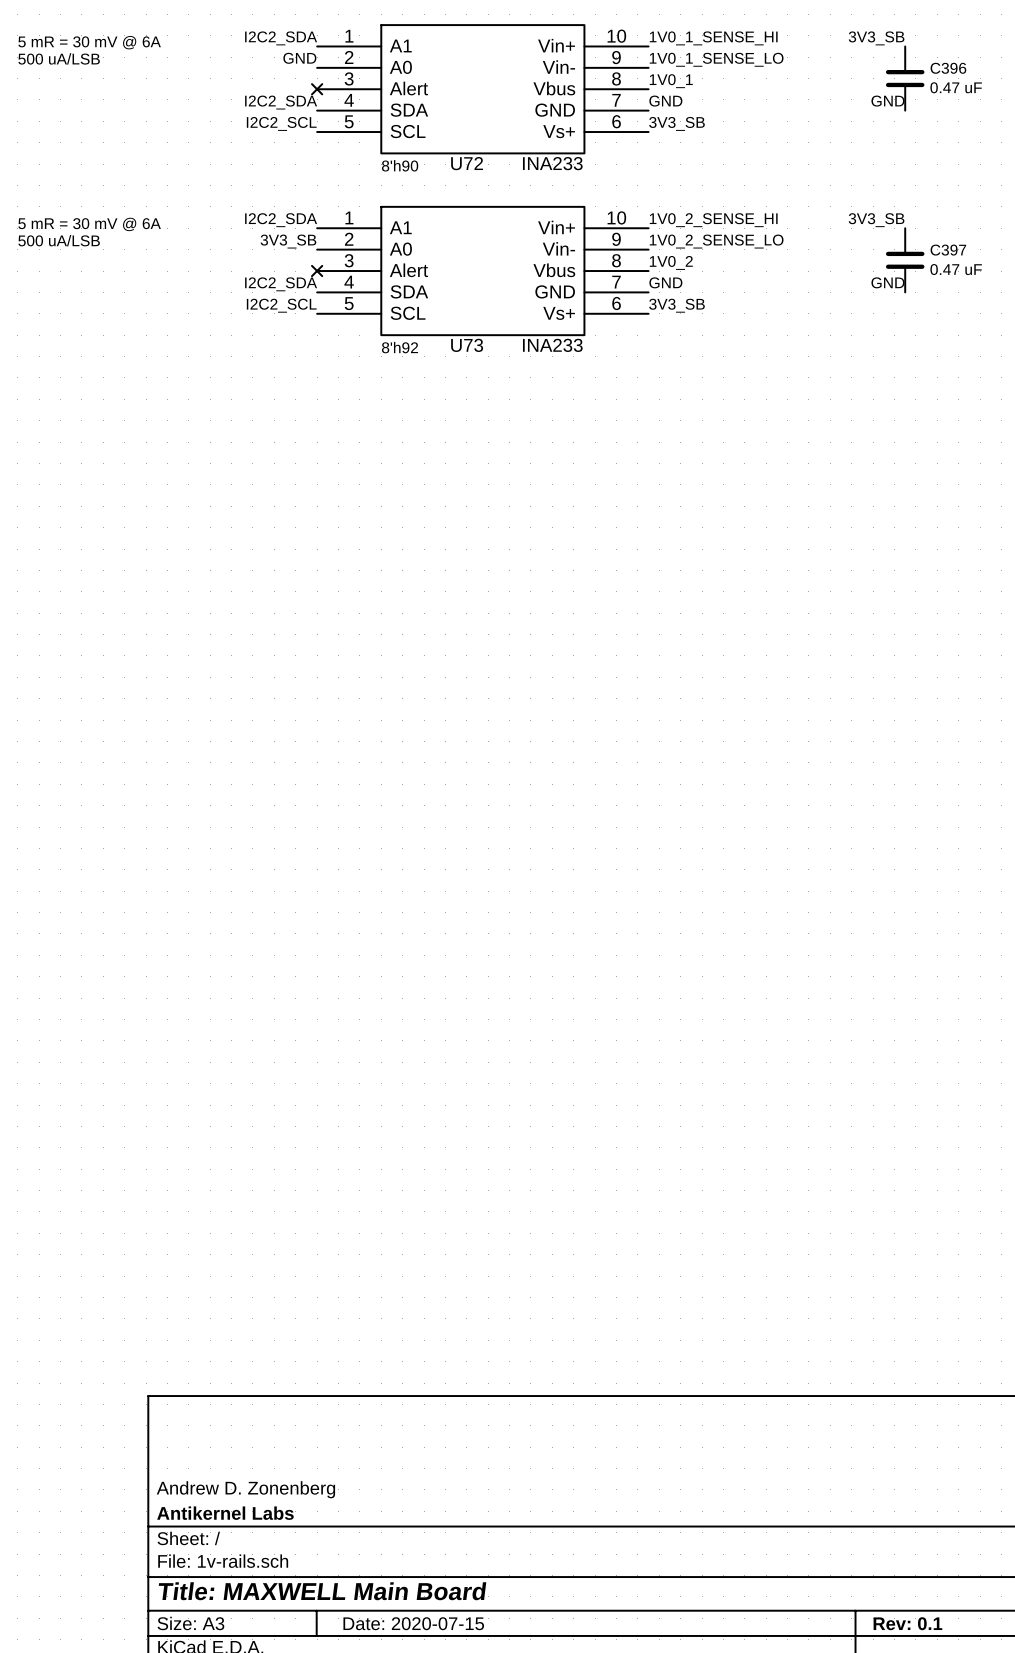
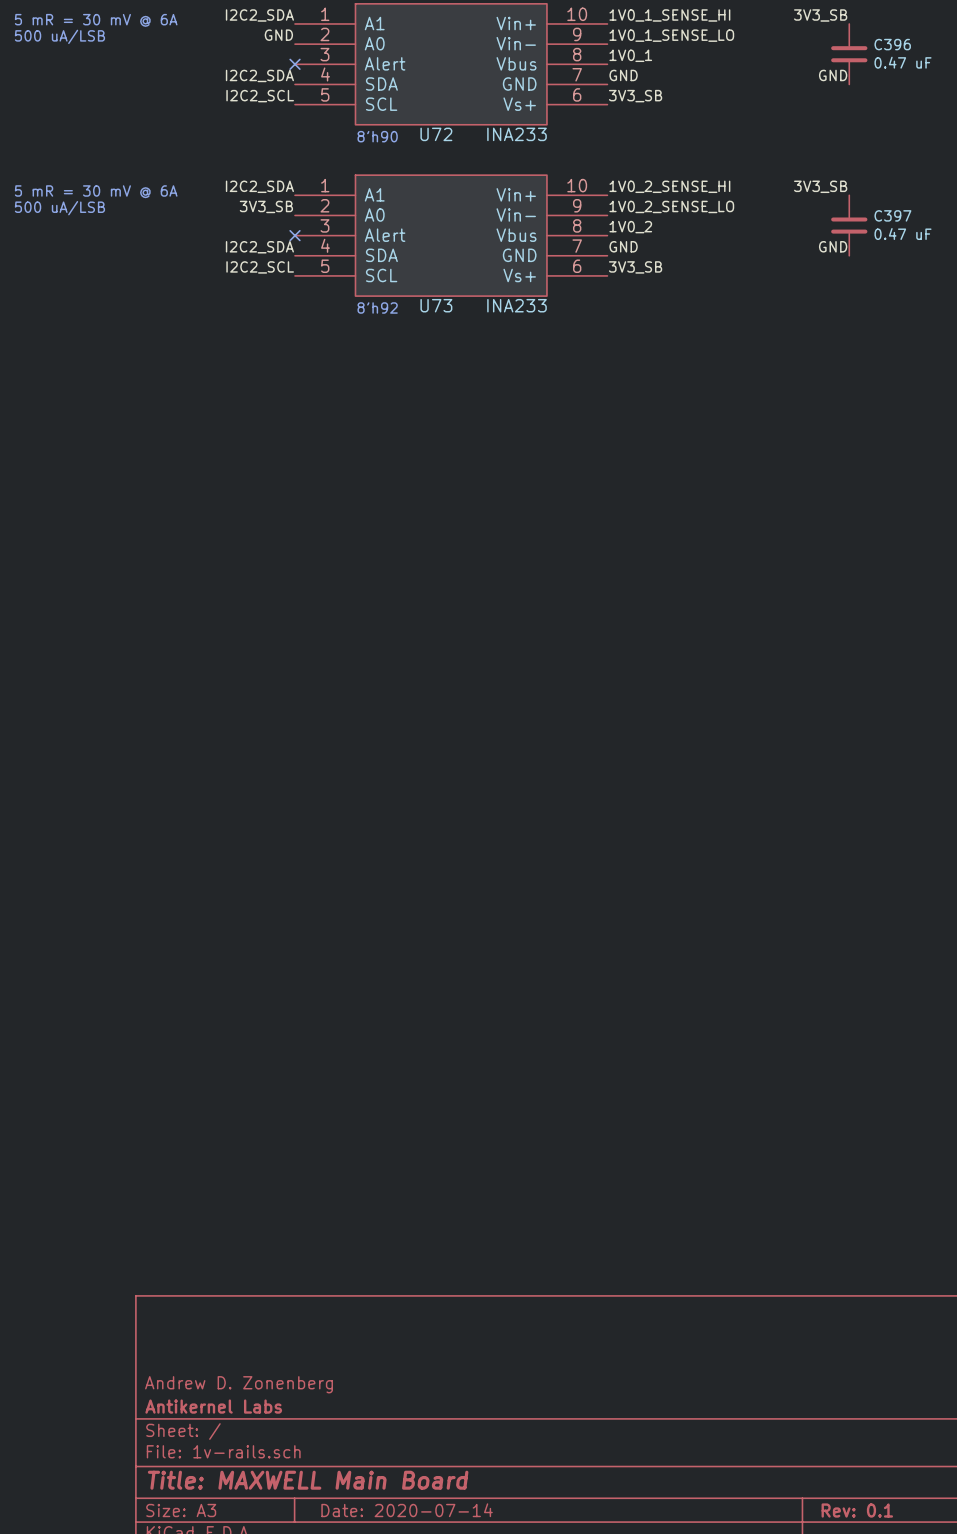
title block: Date: 2020-07-15 (413, 1623) -> Date: 2020-07-14 (407, 1510)

